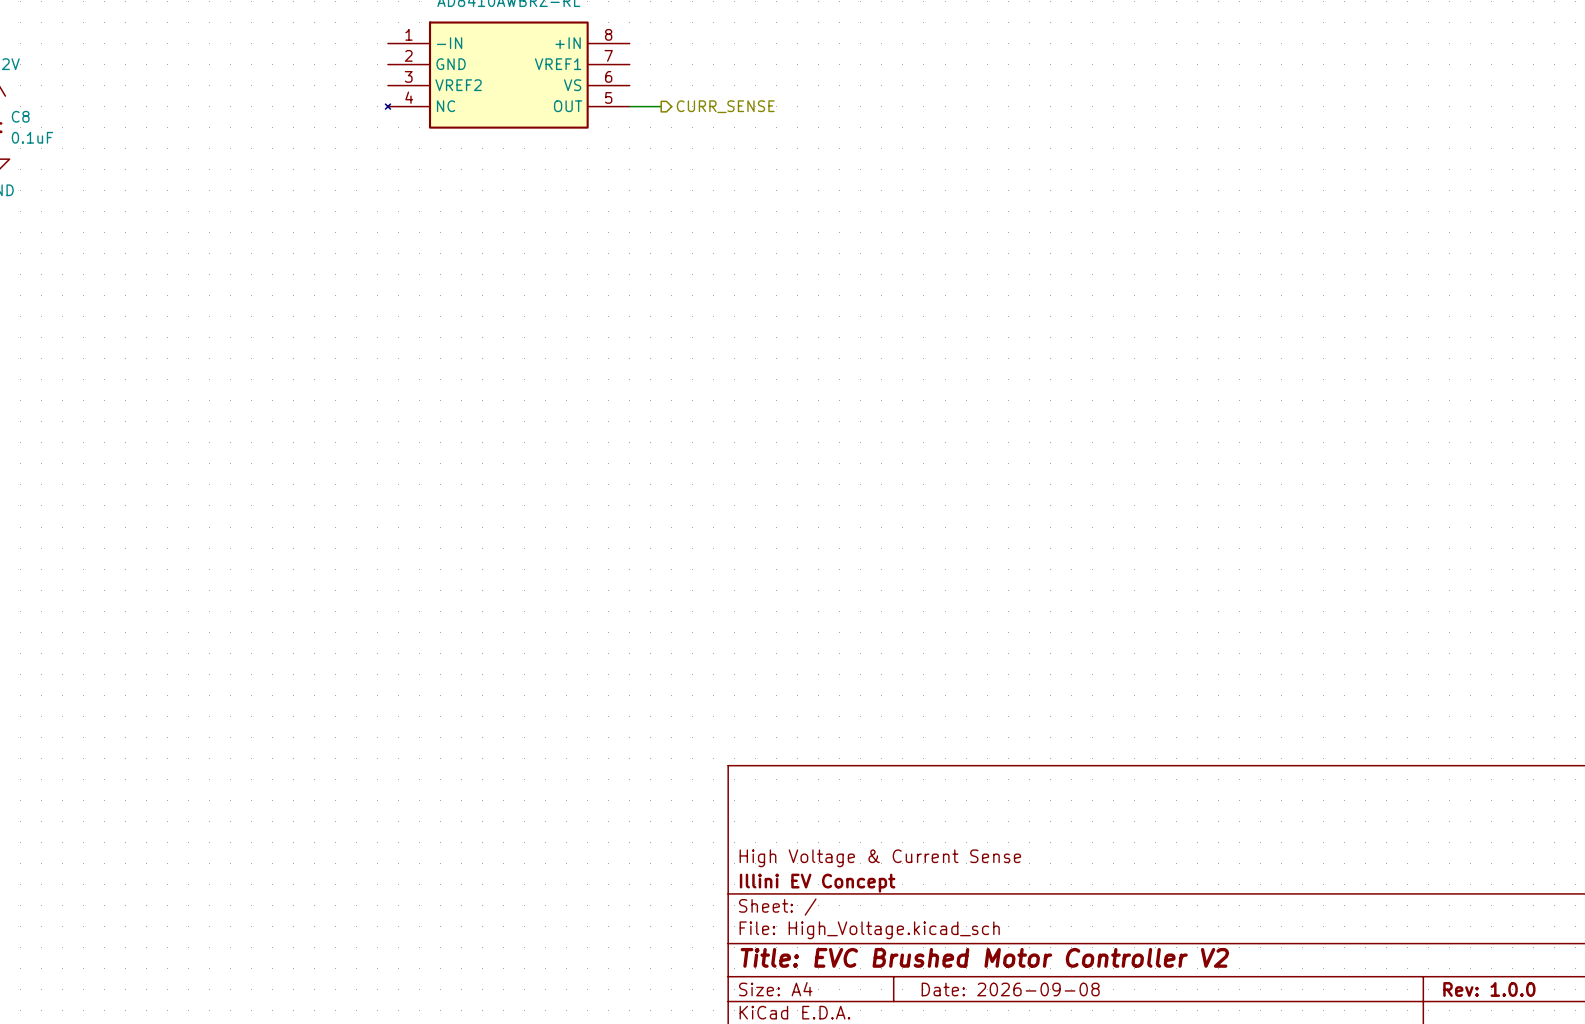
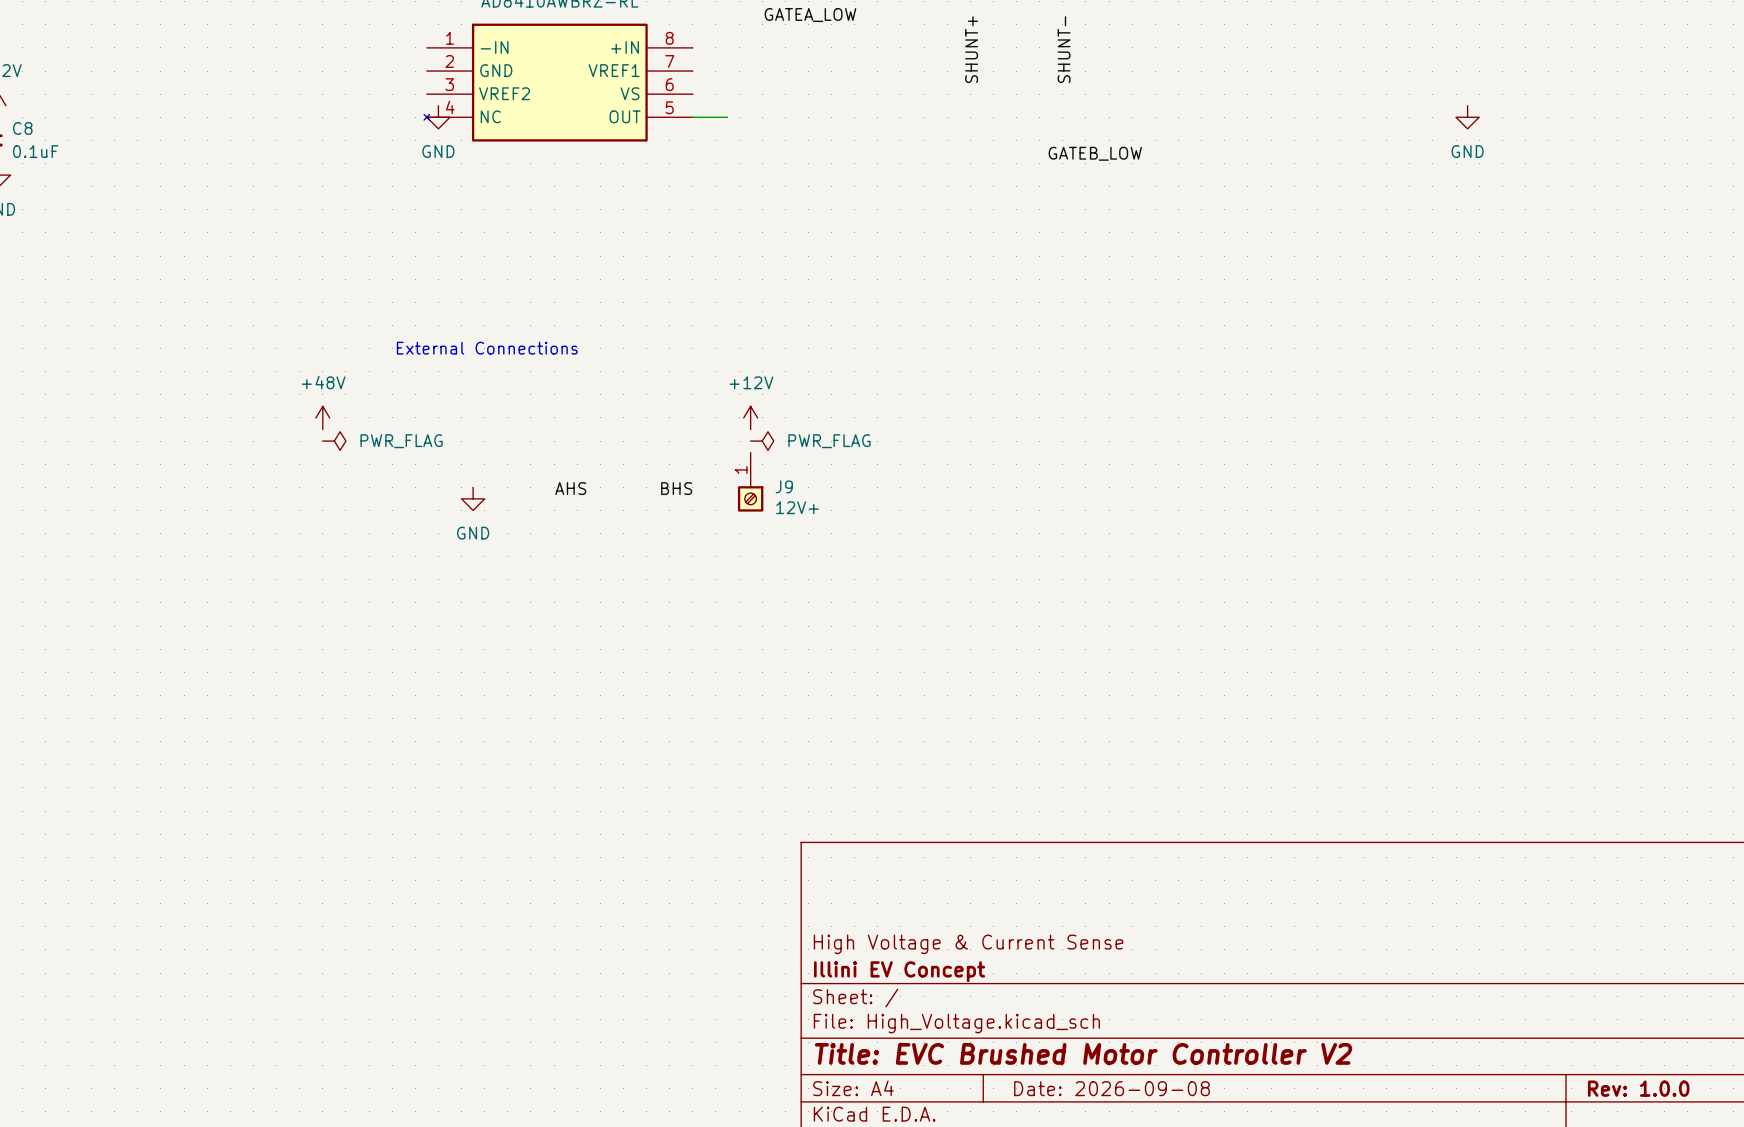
label: none -> GATEA_LOW (810, 15)
label: none -> SHUNT+ (971, 49)
label: none -> SHUNT- (1064, 49)
power symbol: none -> GND (438, 117)
hierarchical label: CURR_SENSE (725, 106) -> none
power symbol: none -> GND (1467, 117)
label: none -> GATEB_LOW (1095, 153)
text: none -> External Connections (487, 348)
power symbol: none -> +48V (322, 417)
power symbol: none -> +12V (750, 417)
power symbol: none -> PWR_FLAG (334, 441)
power symbol: none -> PWR_FLAG (762, 441)
J9: none -> 12V+ (750, 482)
label: none -> AHS (570, 488)
label: none -> BHS (676, 488)
power symbol: none -> GND (473, 498)

